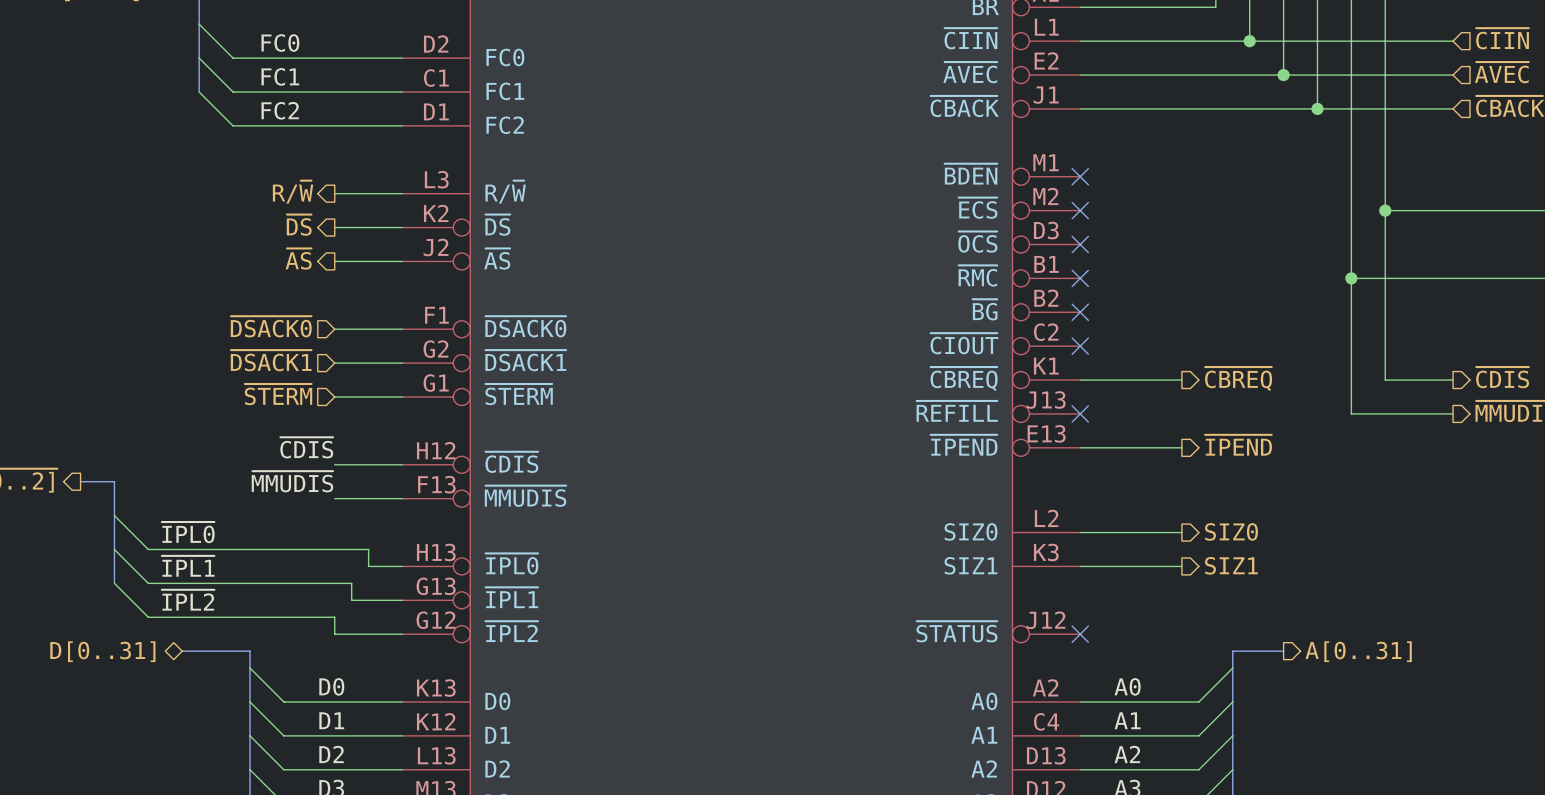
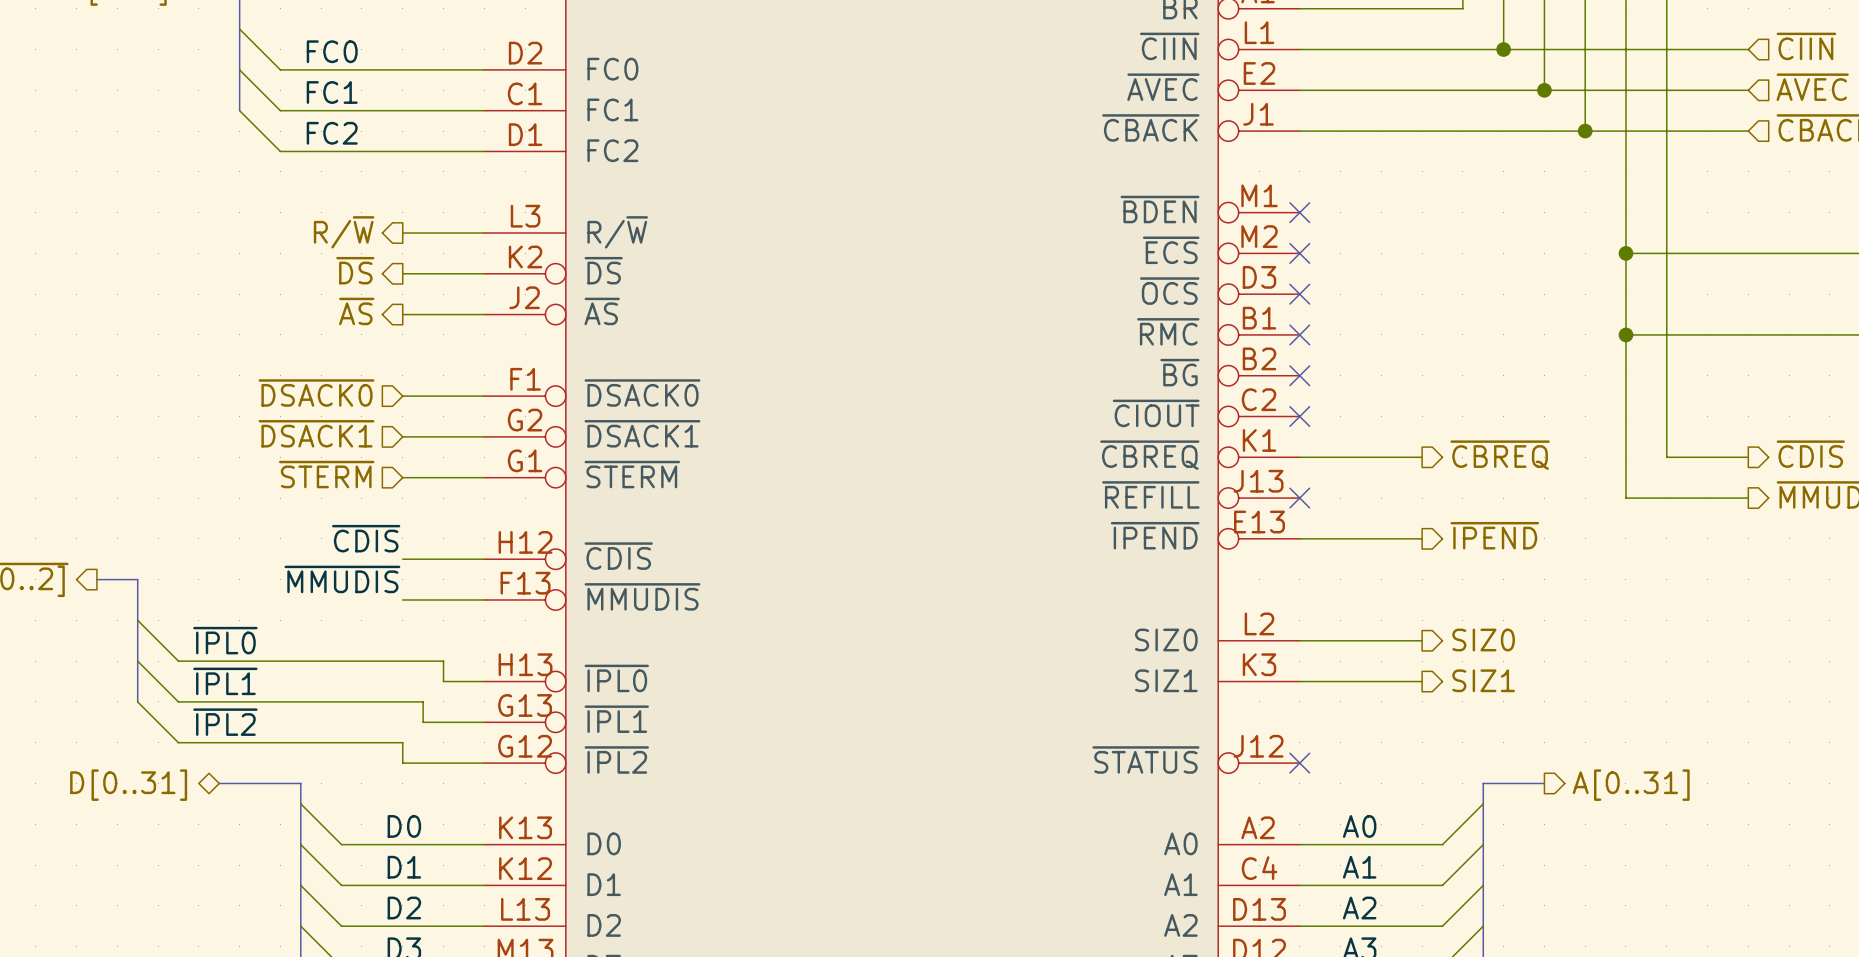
wire: none -> (1625, 253) (1666, 253)
junction position: (1385, 210) -> (1625, 253)

